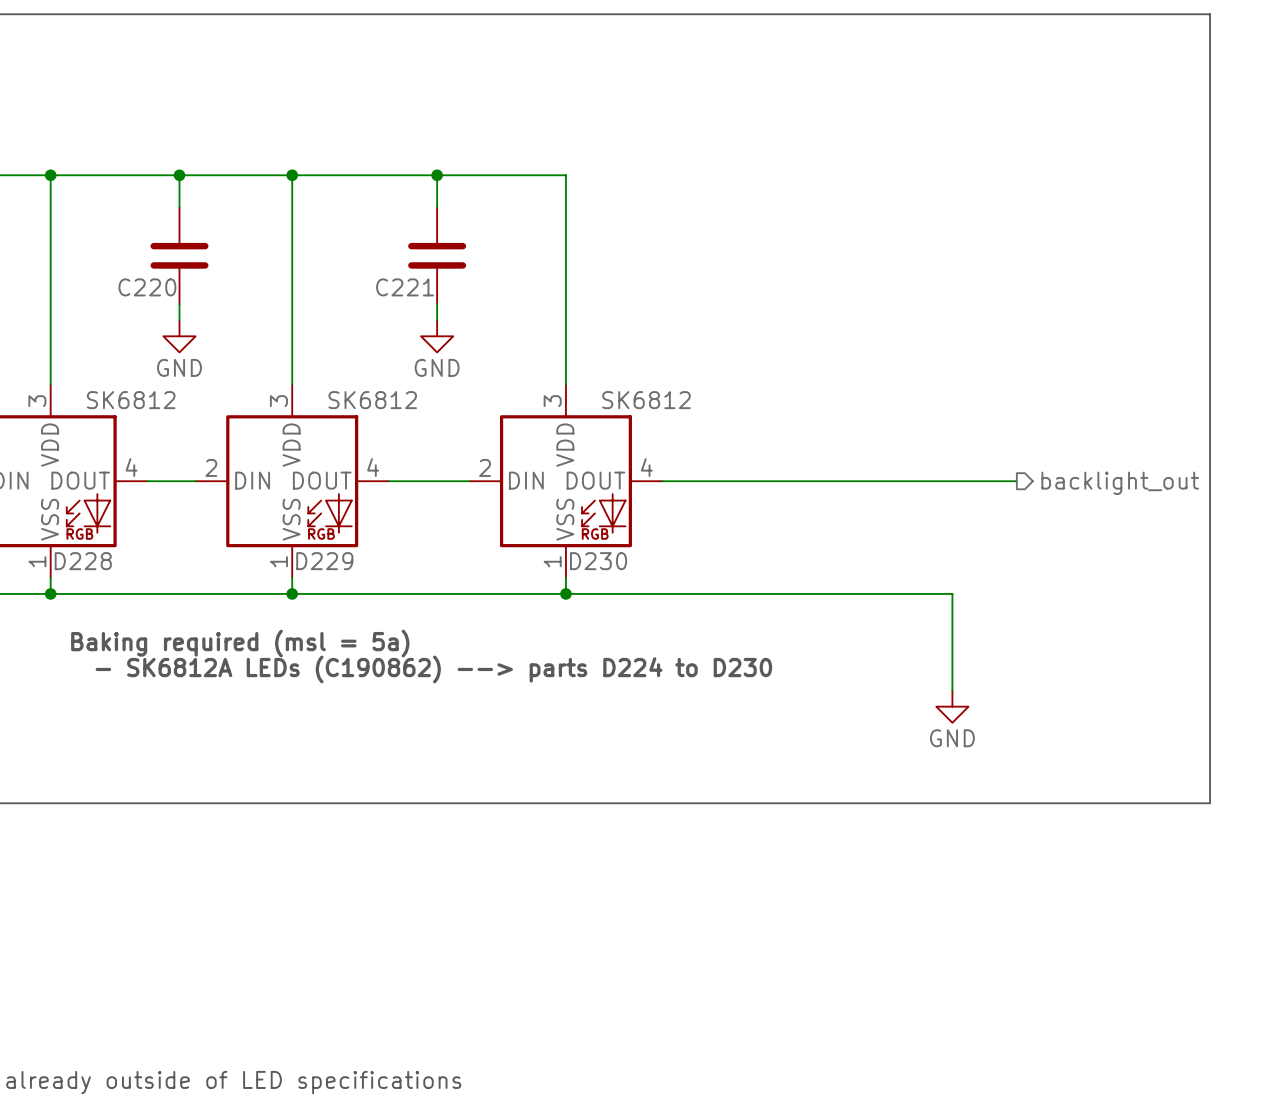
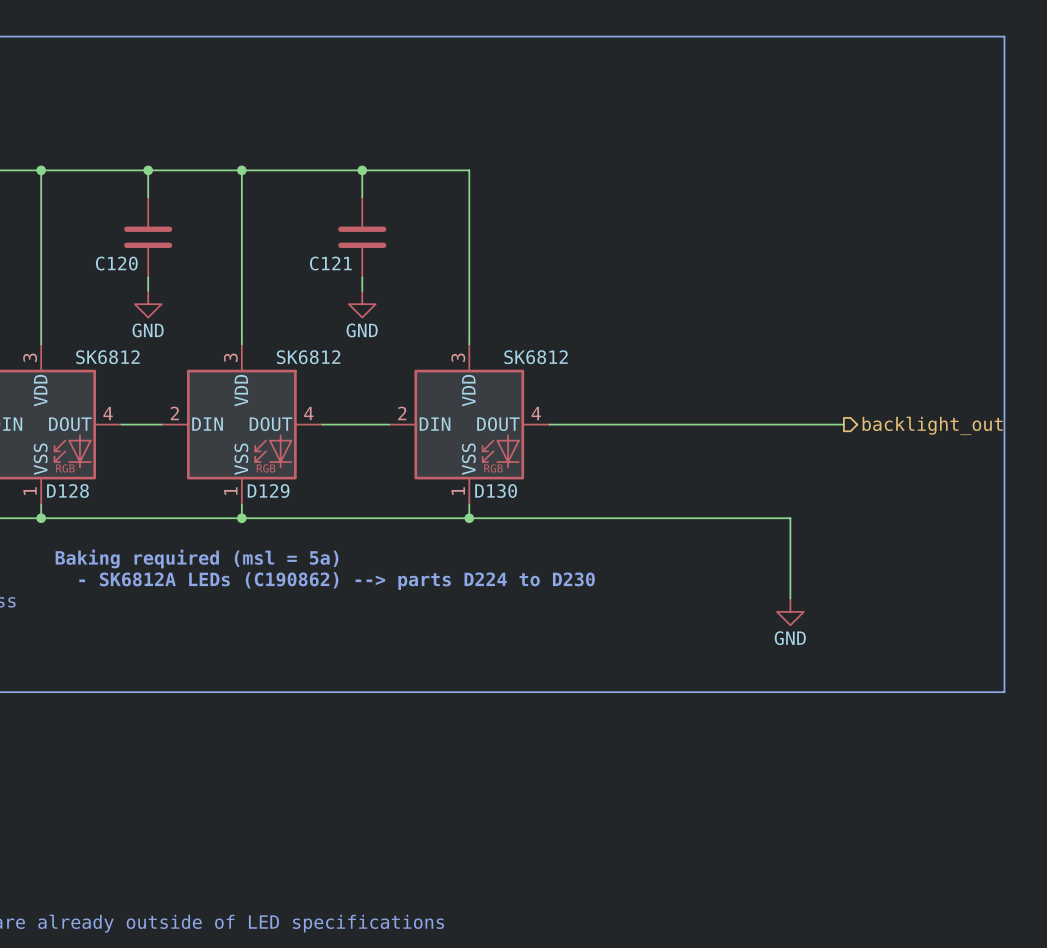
C220 name: C220 (147, 287) -> C120 (116, 263)
C221 name: C221 (405, 287) -> C121 (330, 263)
D228 name: D228 (83, 561) -> D128 (67, 490)
D229 name: D229 (324, 561) -> D129 (268, 490)
D230 name: D230 (598, 561) -> D130 (496, 490)

